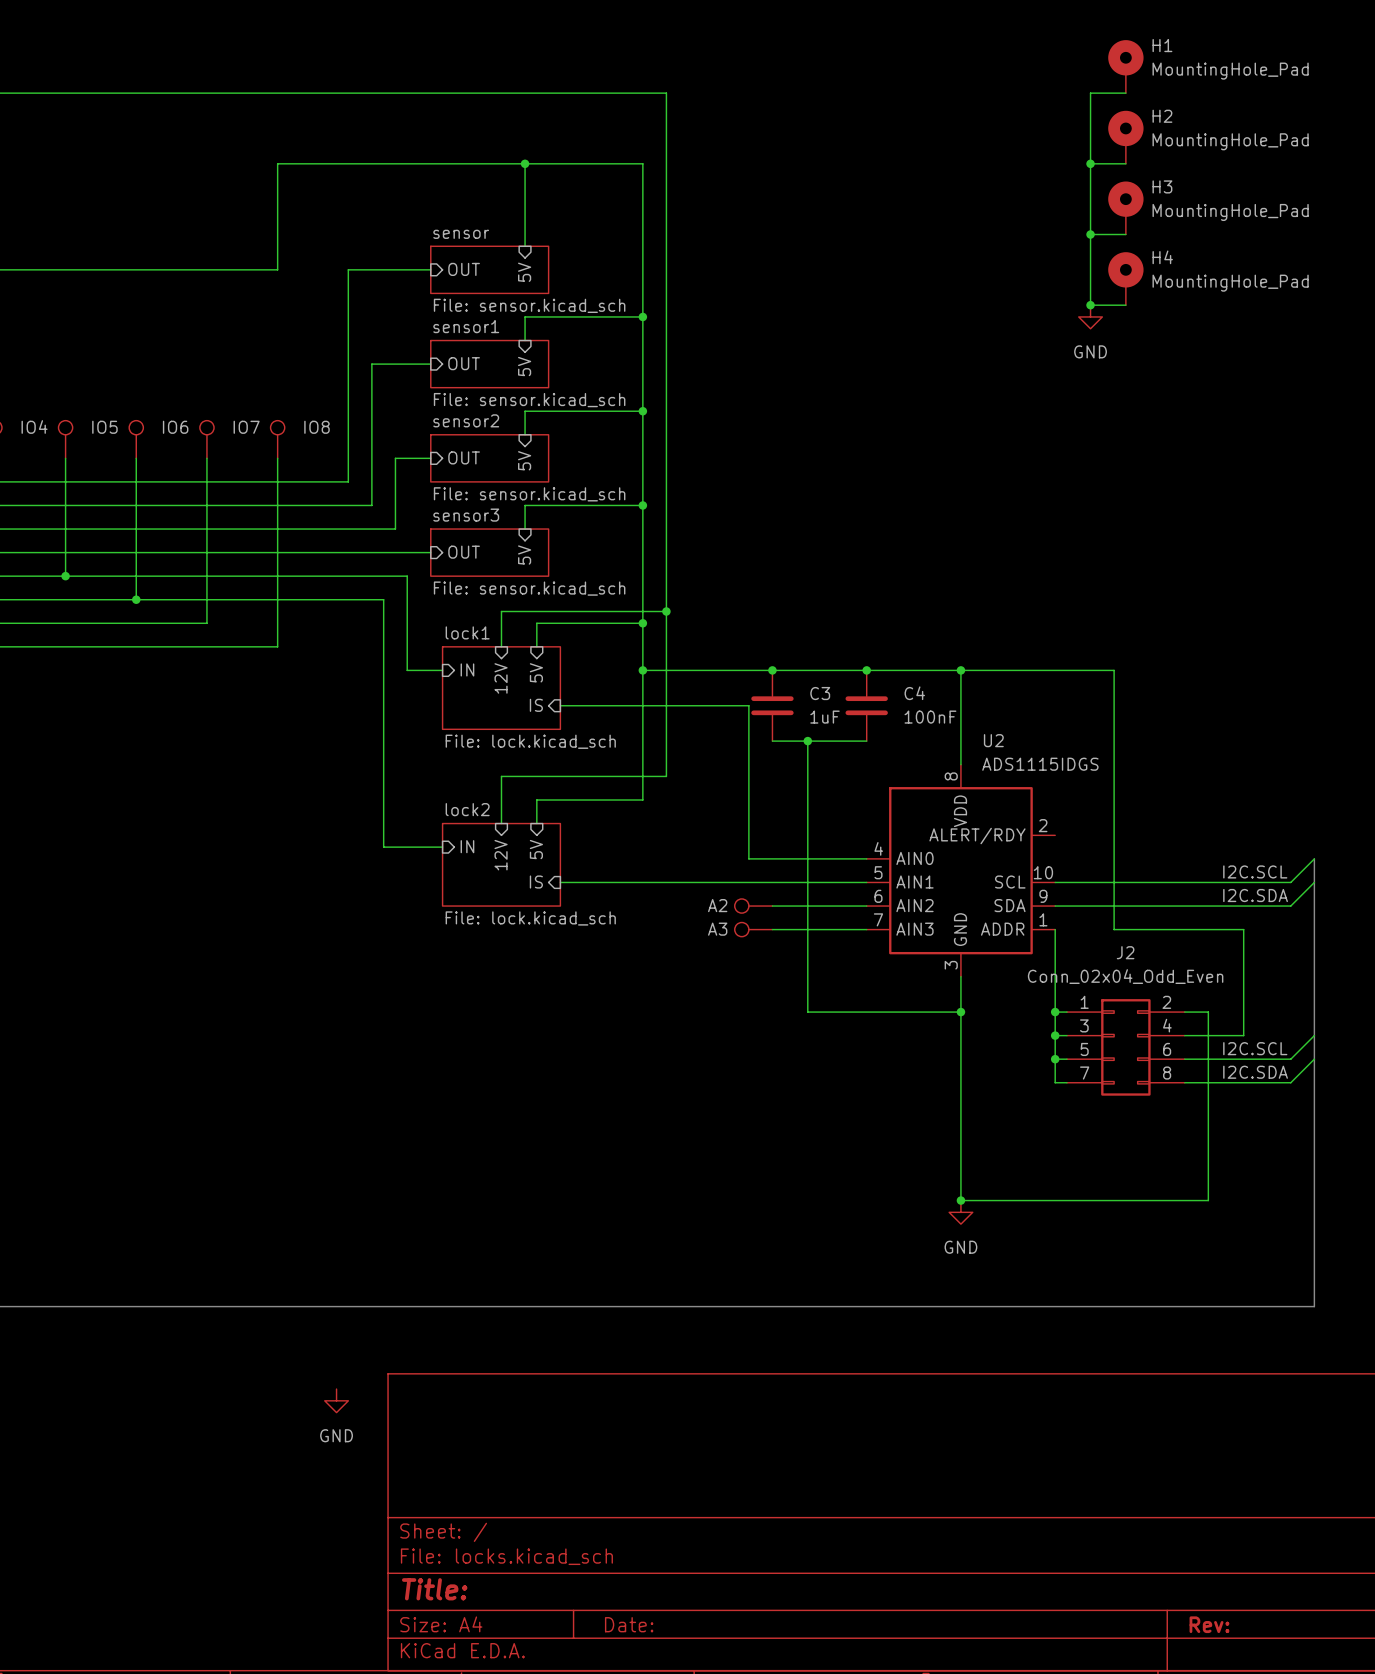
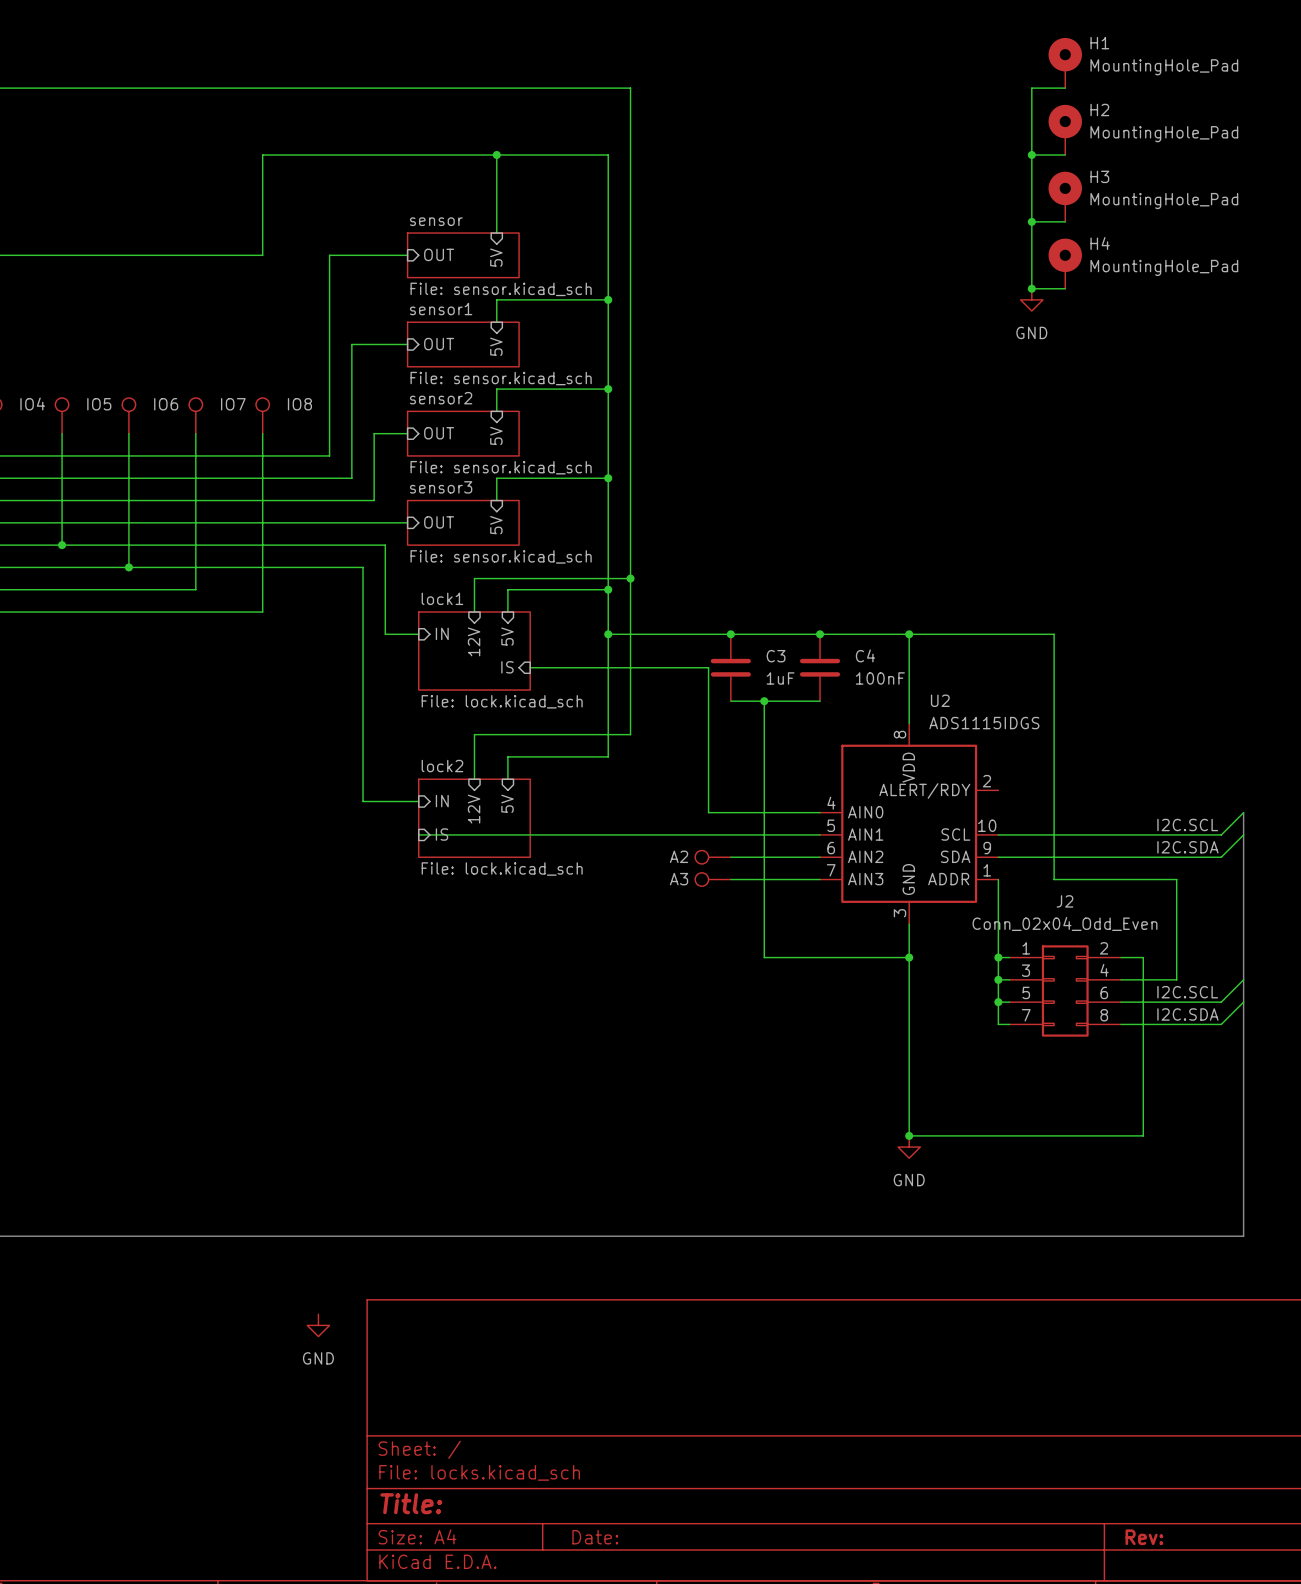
wire: none -> (418, 834) (530, 834)
sheet pin rotation: 0° (536, 882) -> 180° (442, 834)
sheet pin position: IS (536, 882) -> IS (442, 834)

